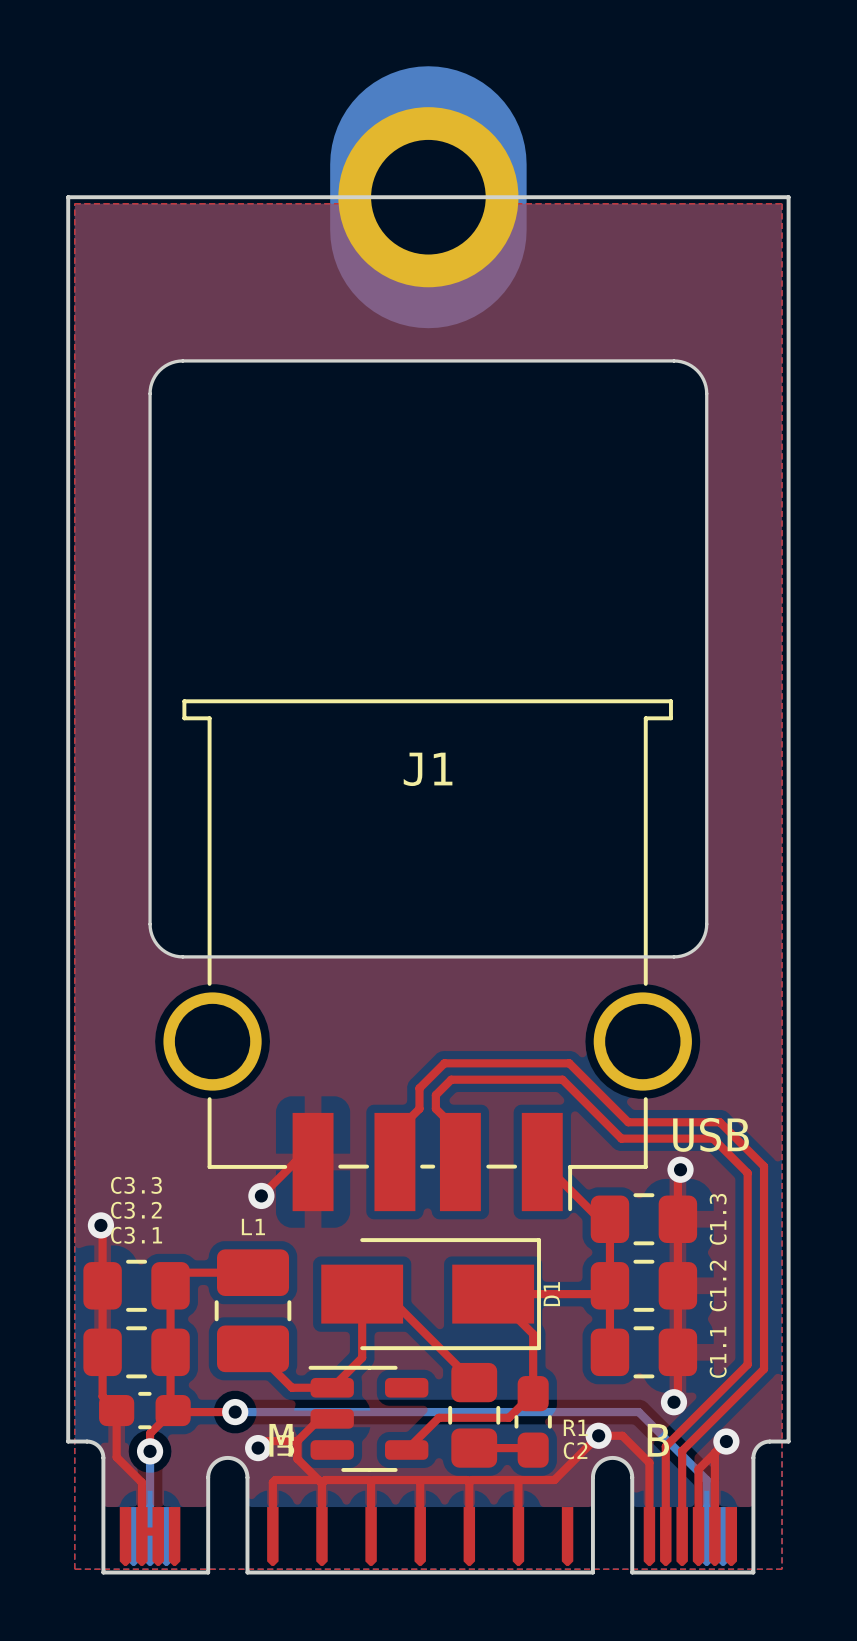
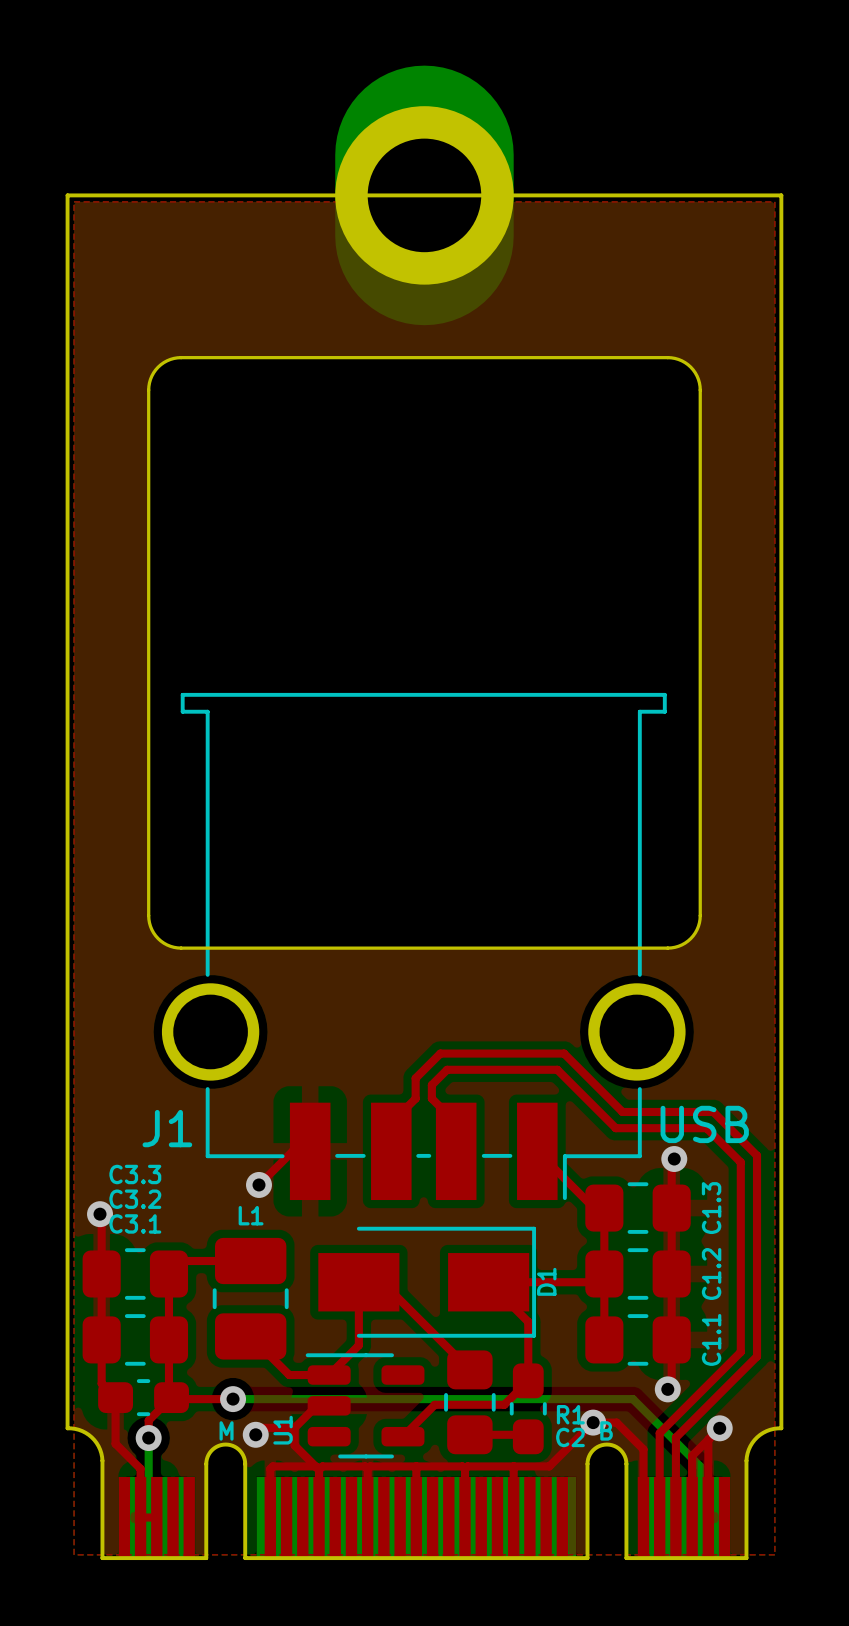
J1 footprint: [66, 66, 791, 1575] -> [65, 65, 784, 1561]
J1 name position: J1 (428, 769) -> J1 (167, 1128)

